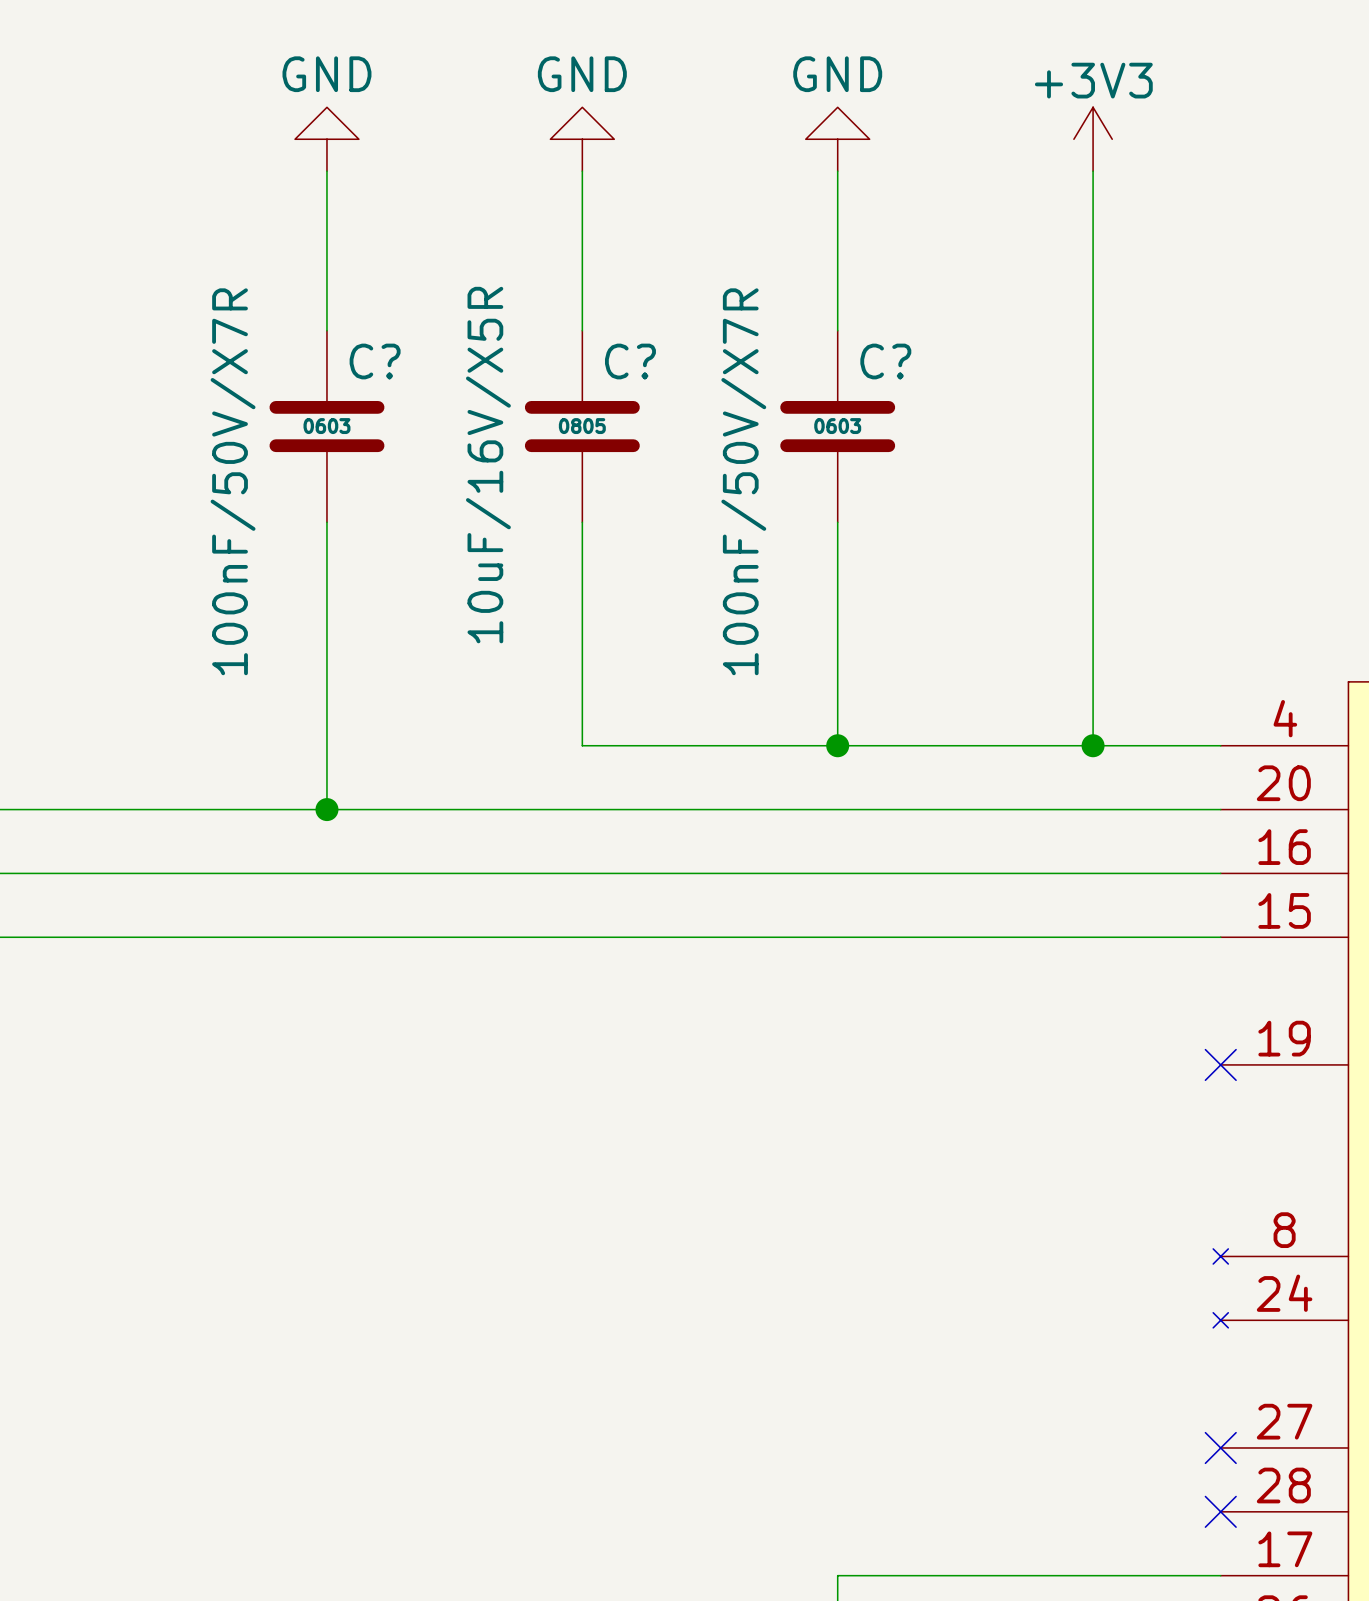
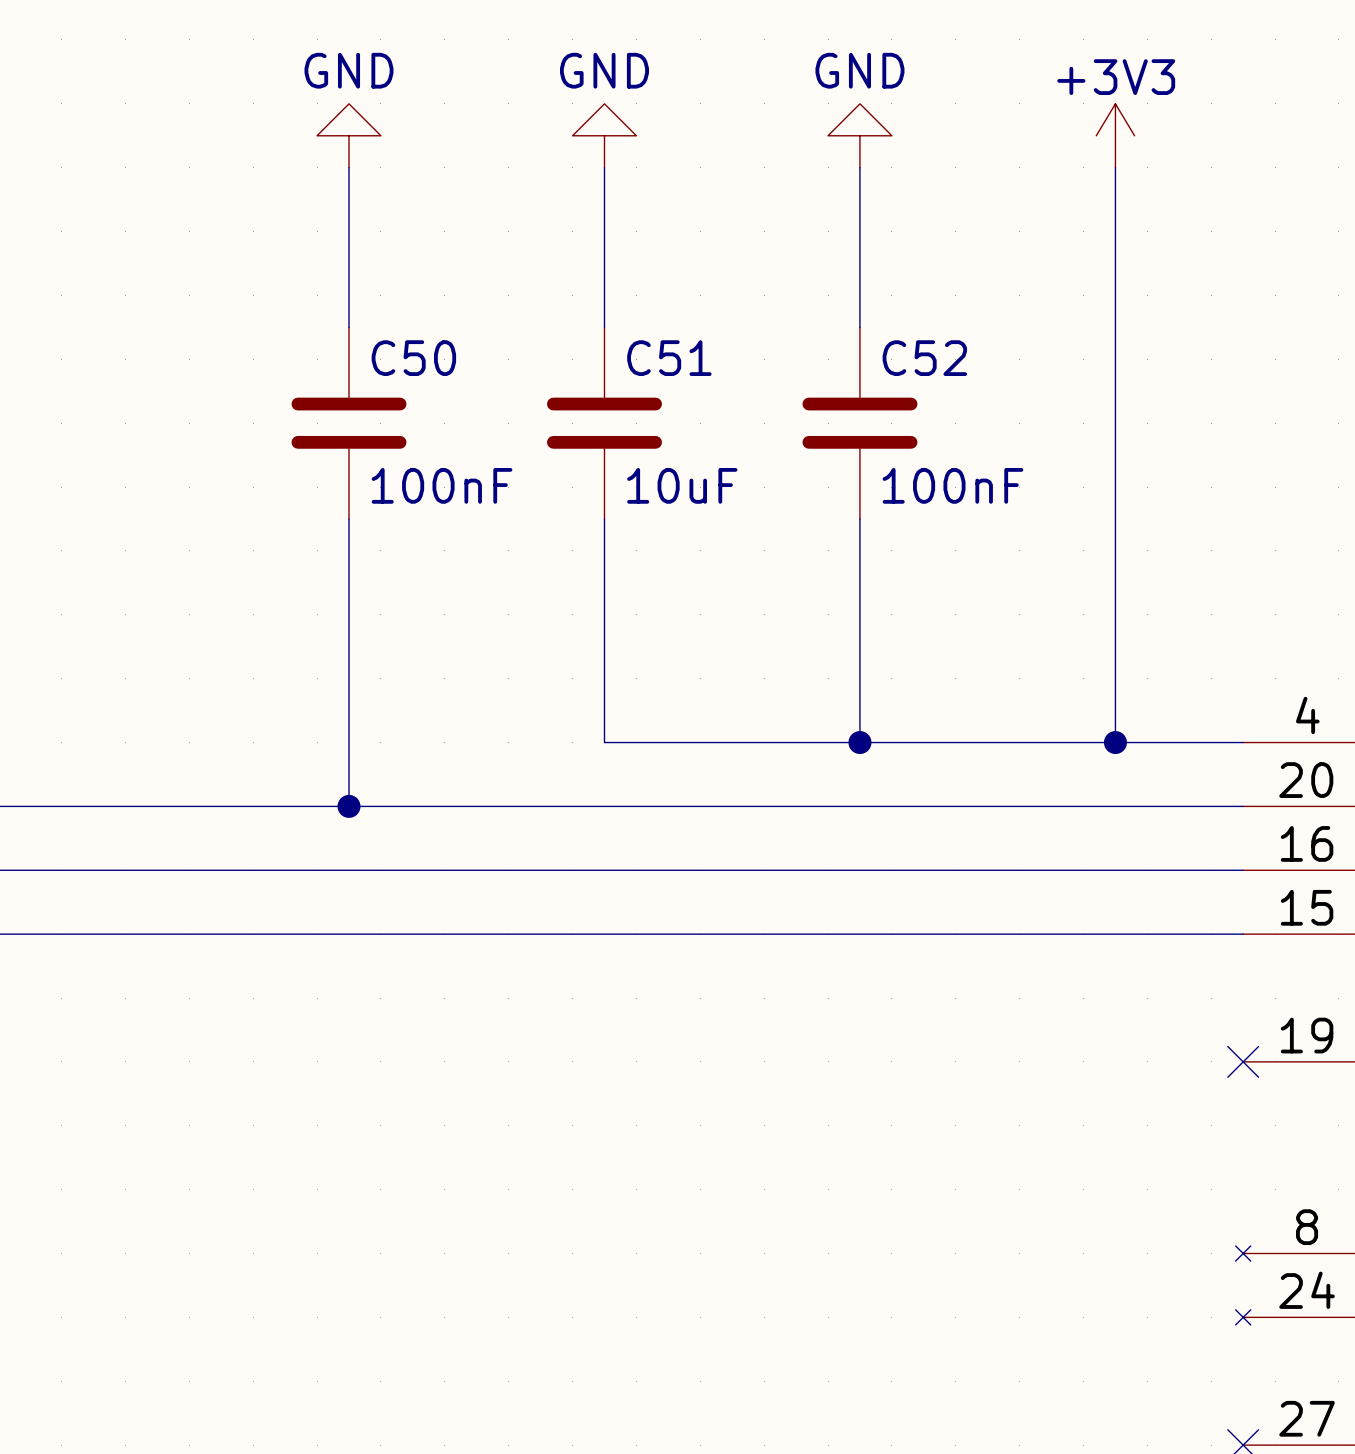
C? name: C? (375, 361) -> C50 (413, 358)
C? name: C? (630, 361) -> C51 (669, 358)
C? name: C? (885, 361) -> C52 (924, 358)
C? text: 0603 (326, 426) -> none
C? text: 0805 (582, 426) -> none
C? text: 0603 (837, 426) -> none
C? value: 10uF/16V/X5R (488, 465) -> 10uF (682, 485)
C? value: 100nF/50V/X7R (233, 481) -> 100nF (442, 485)
C? value: 100nF/50V/X7R (743, 481) -> 100nF (952, 485)

